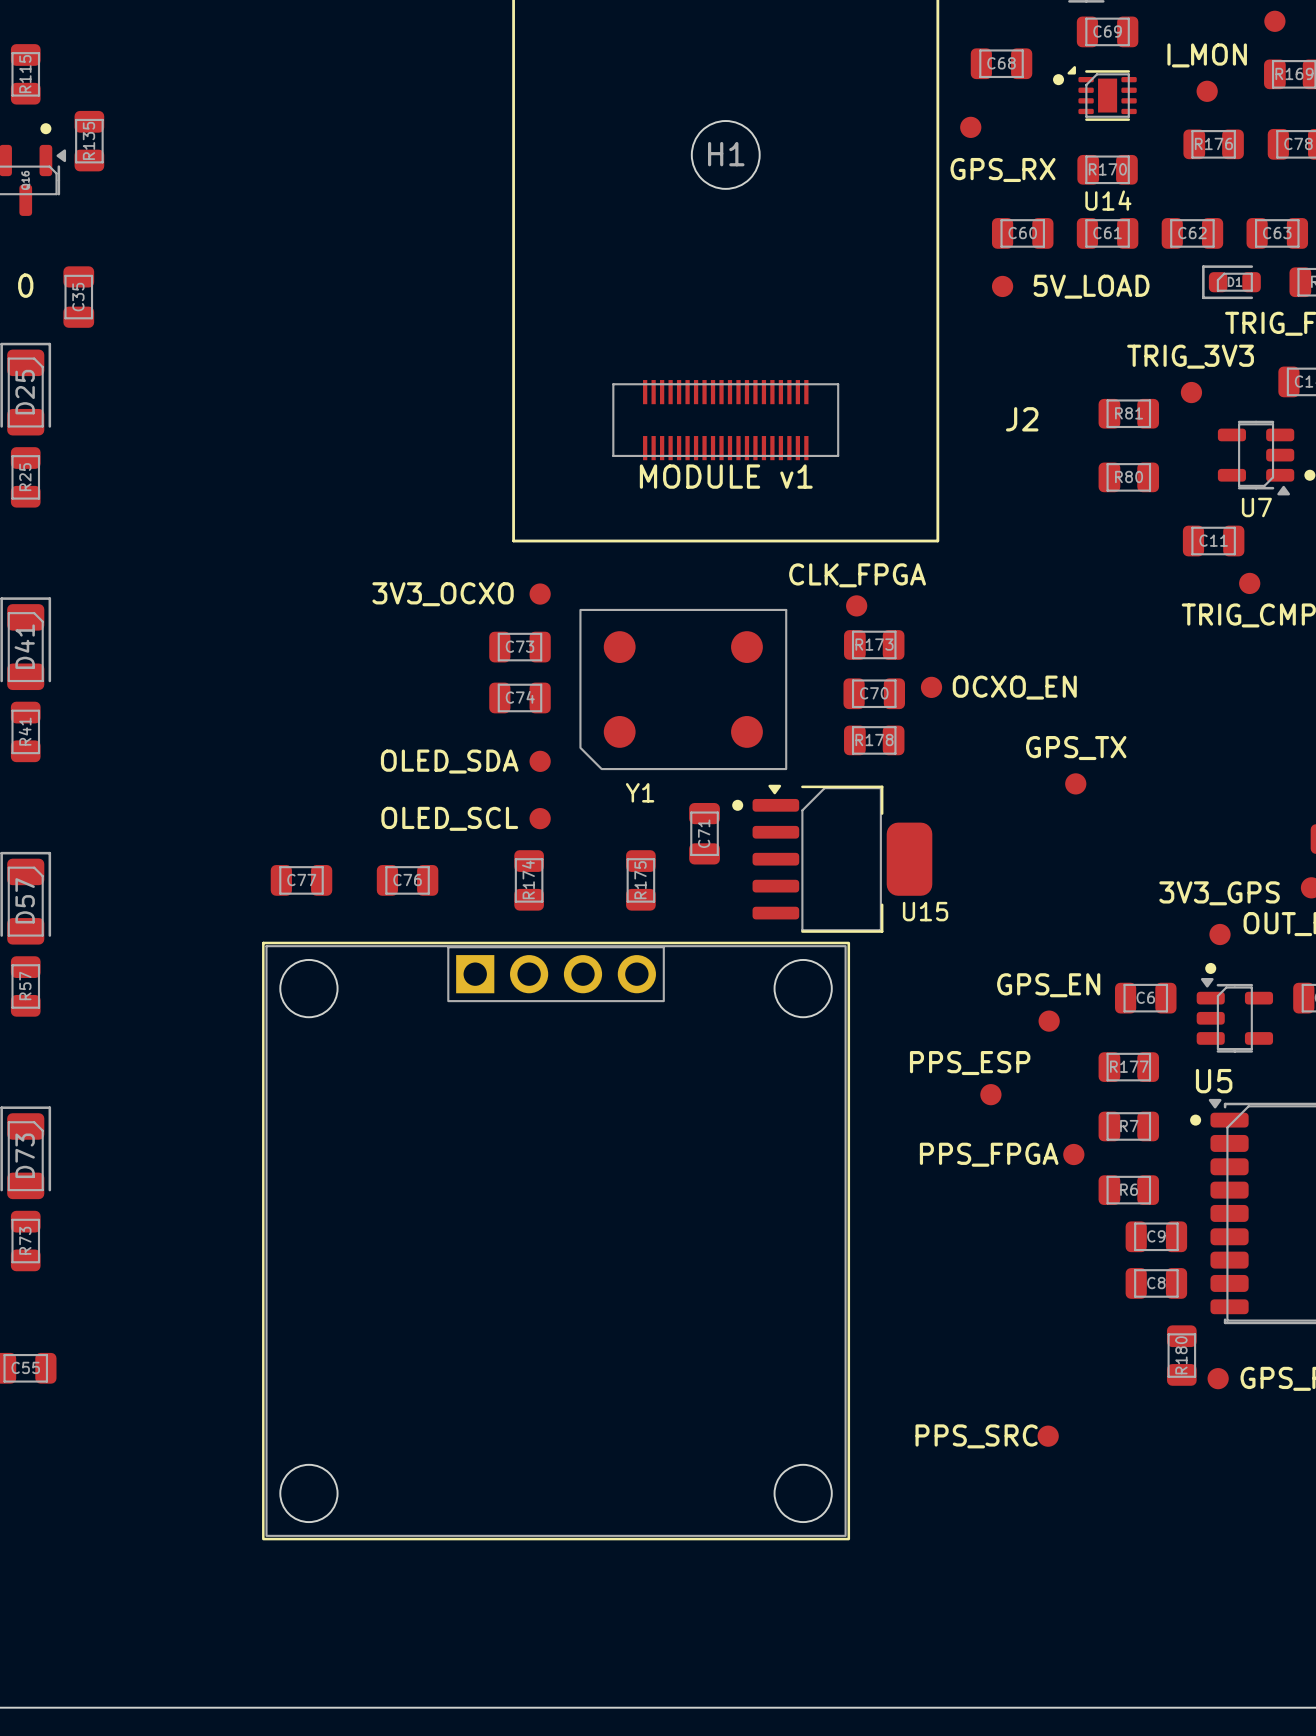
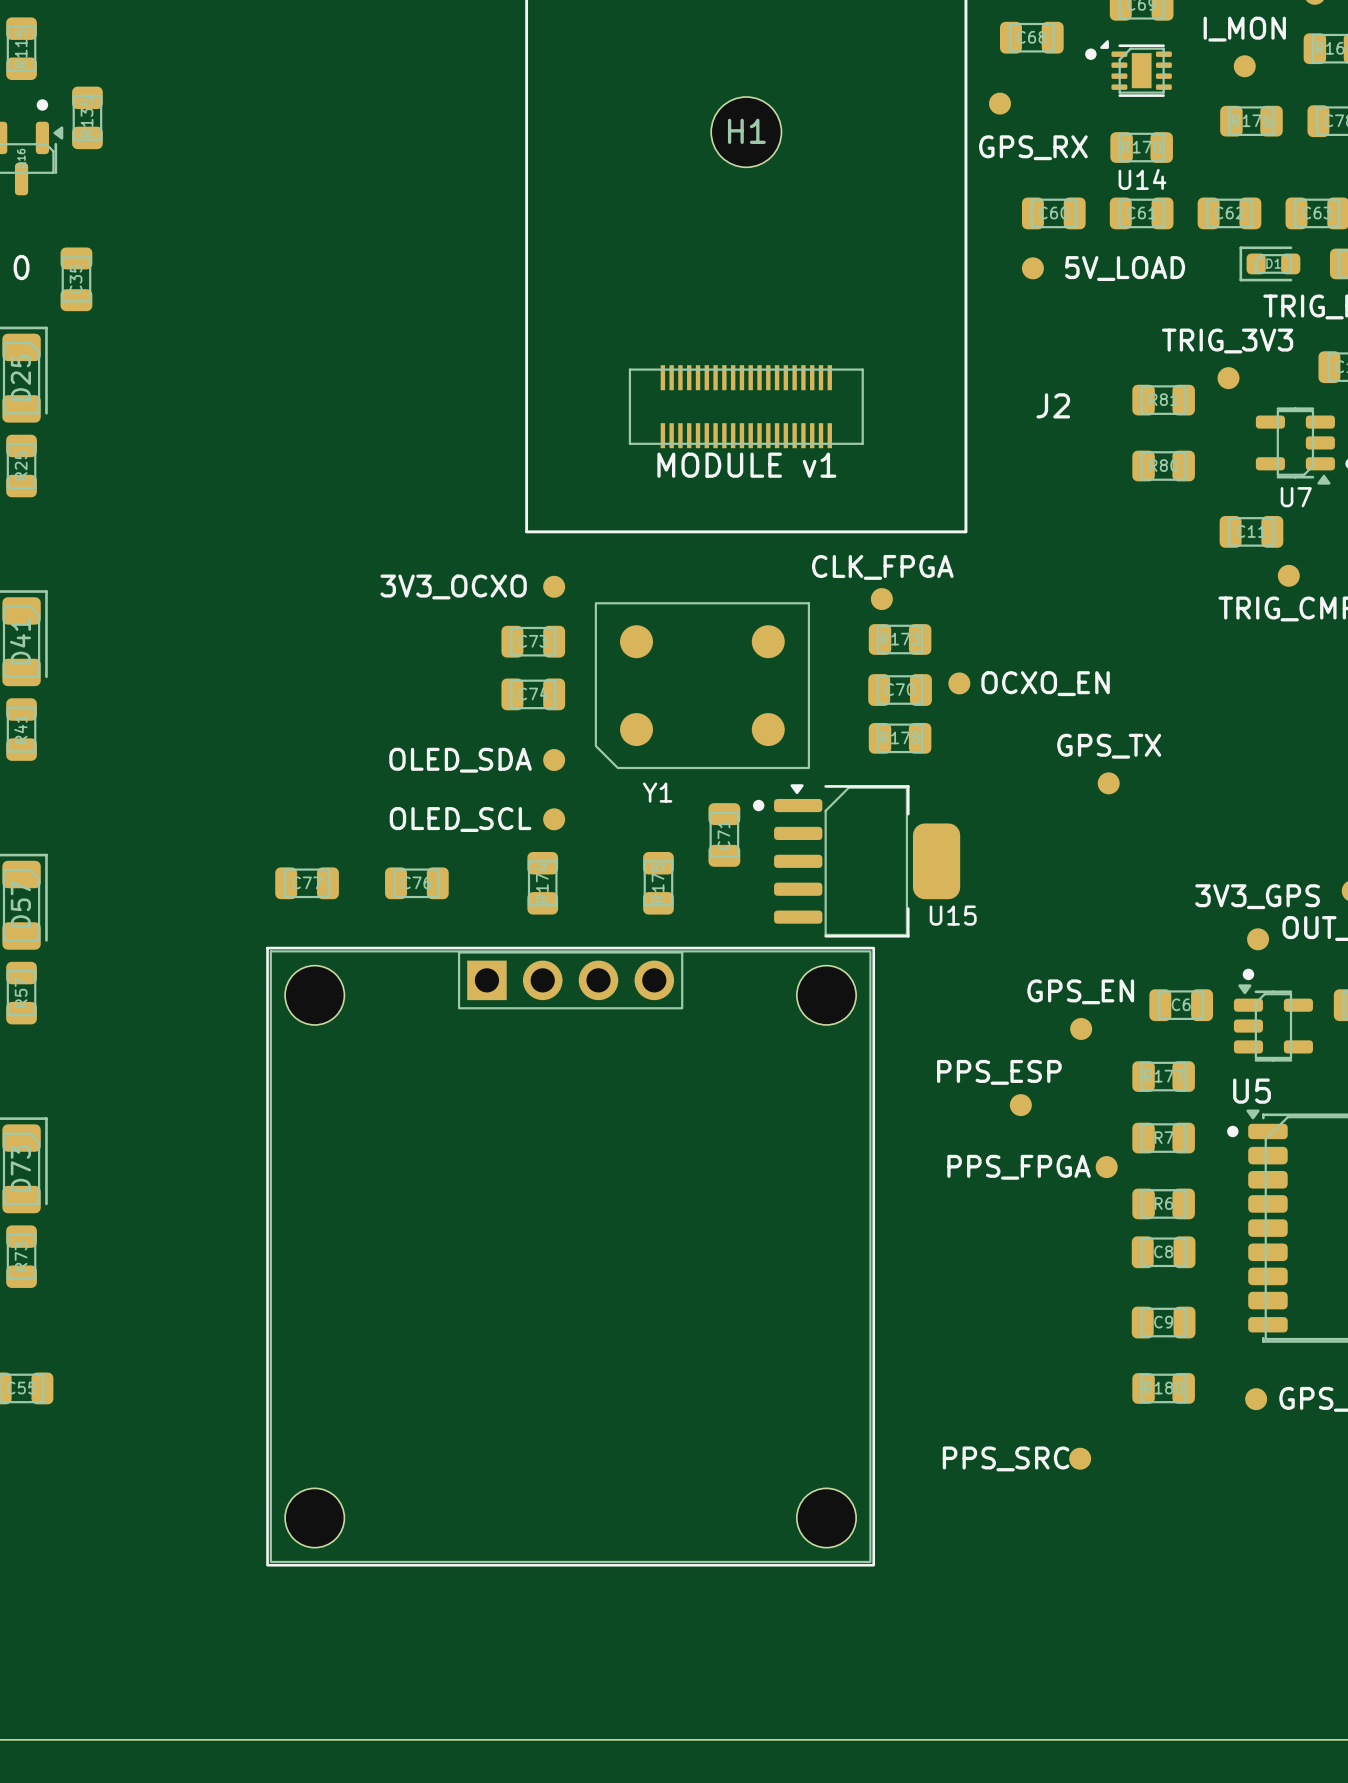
C9 position: (1156, 1236) -> (1163, 1322)
C8 position: (1156, 1283) -> (1163, 1252)
R180 rotation: 0° (1181, 1355) -> 90° clockwise (1163, 1388)
R180 position: (1181, 1355) -> (1163, 1388)

